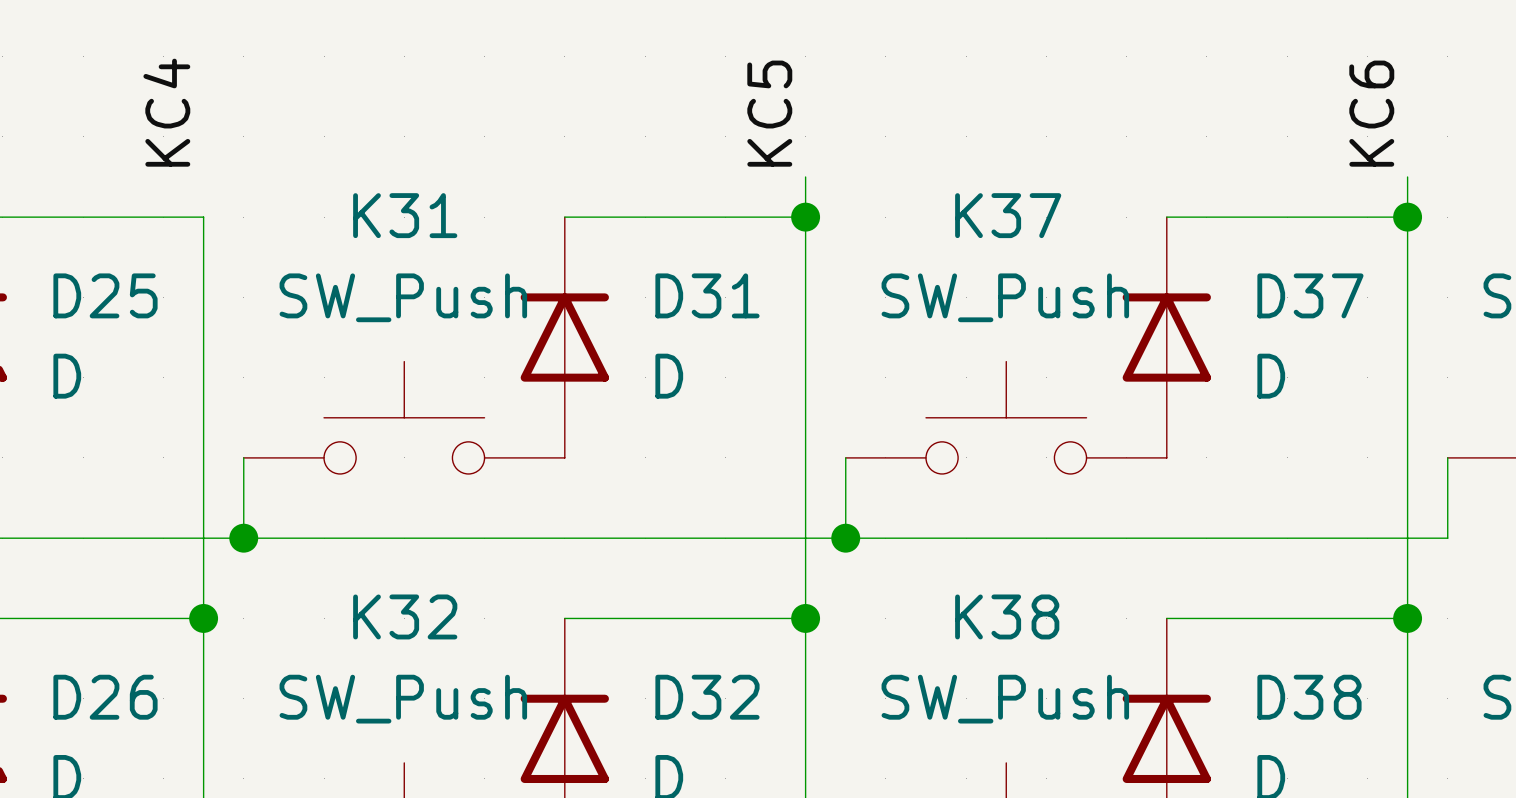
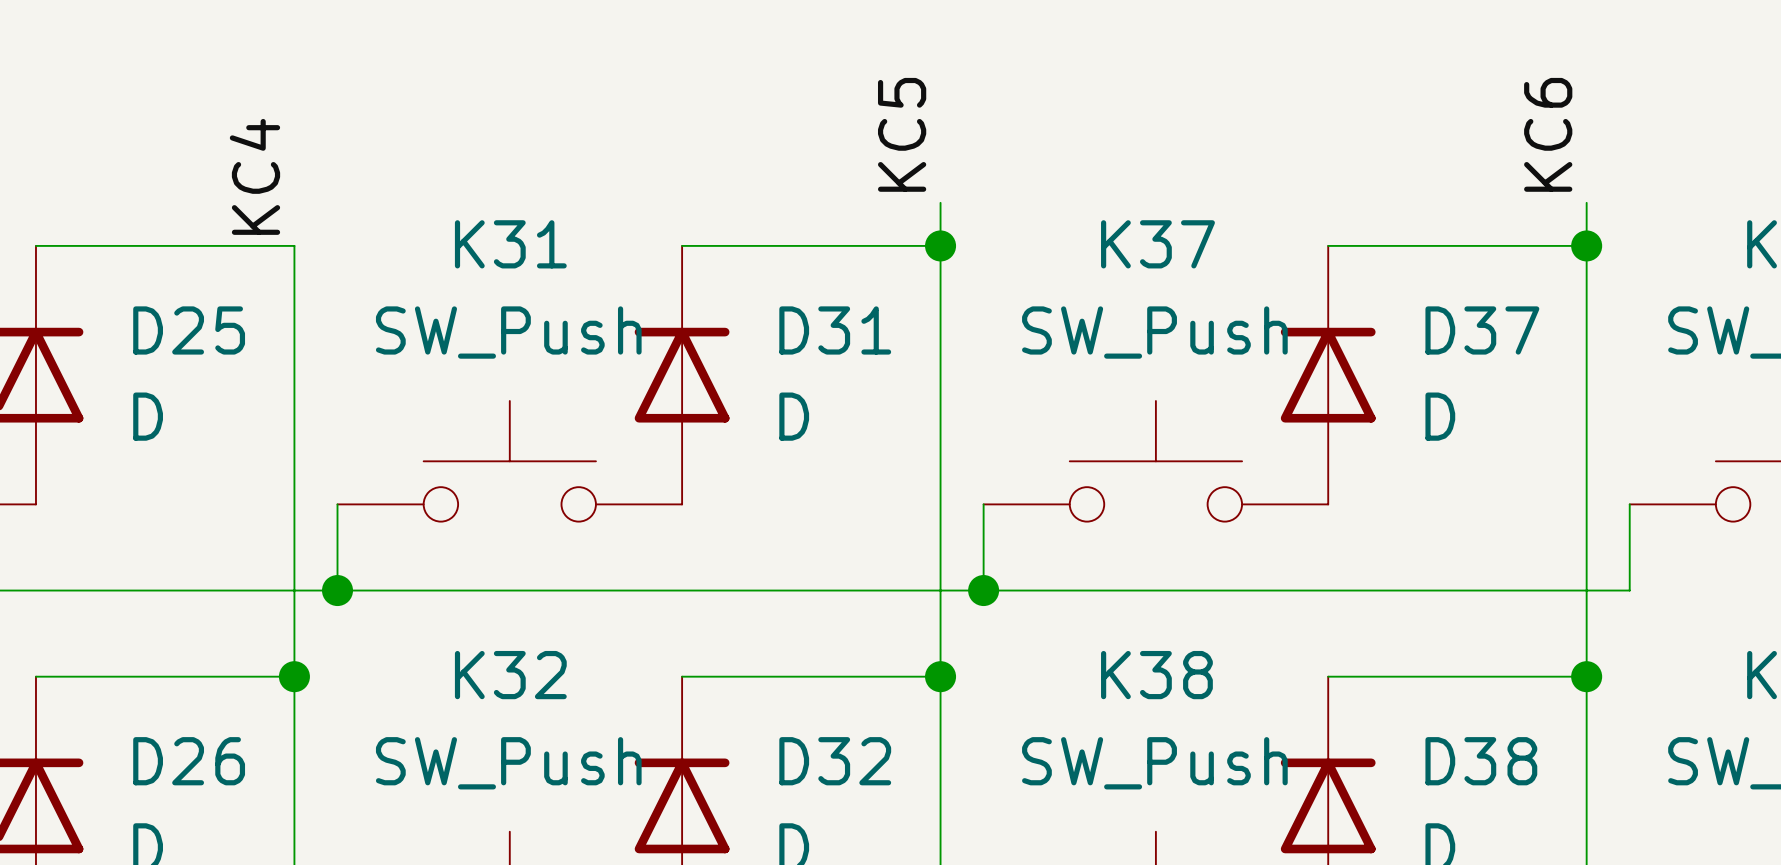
label position: KC4 (166, 112) -> KC4 (254, 176)

